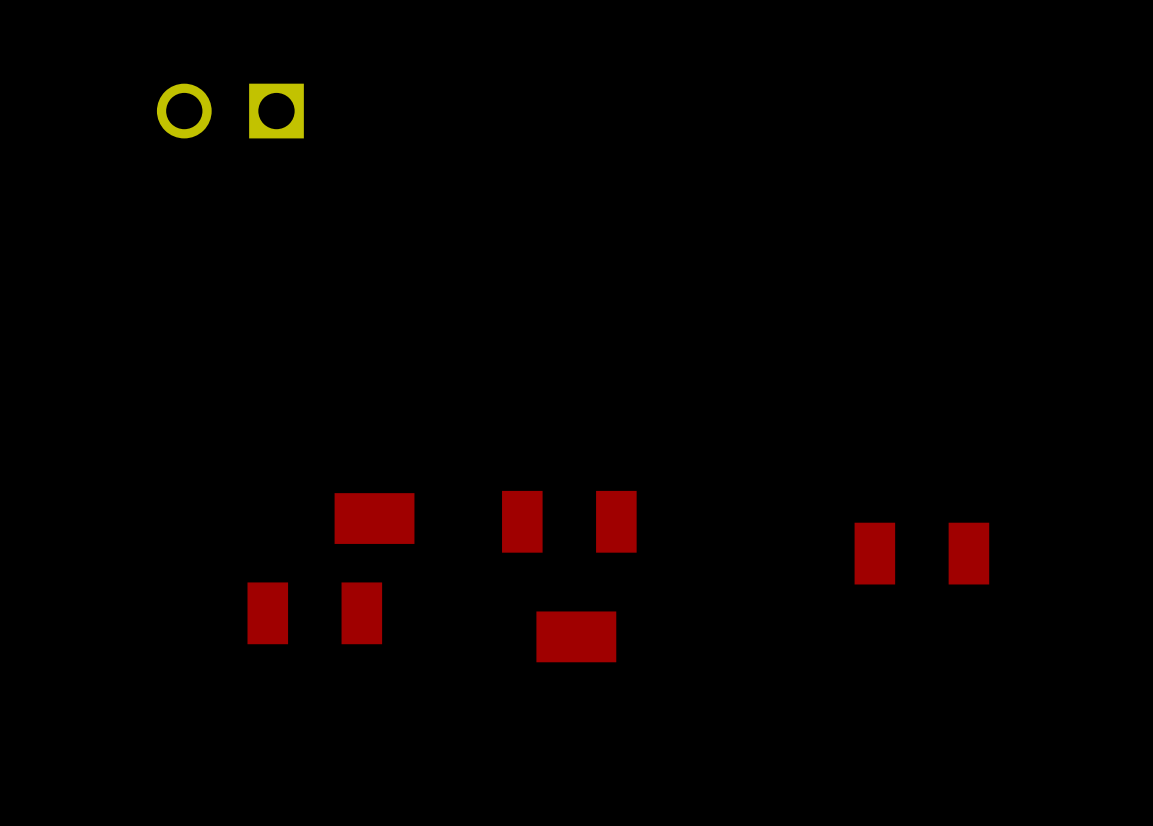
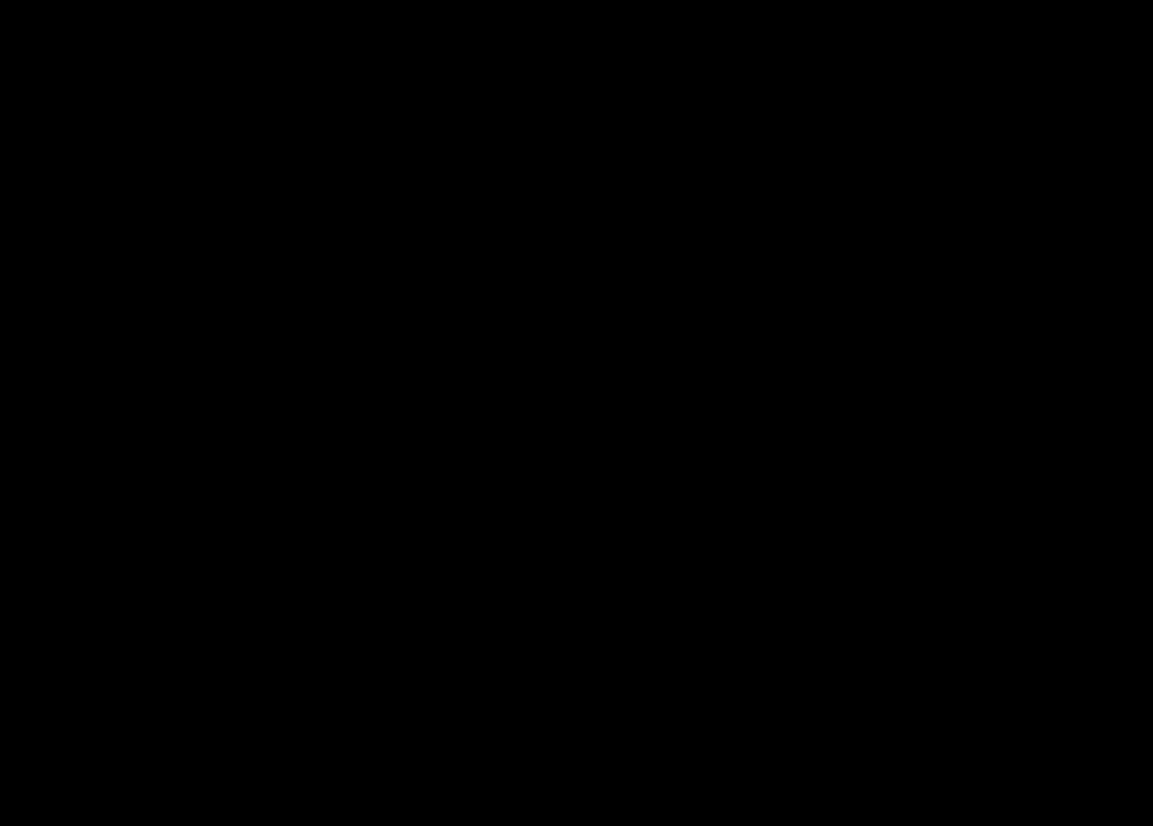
part: (230, 111) -> none
part: (374, 518) -> none
part: (569, 521) -> none
part: (921, 553) -> none
part: (314, 613) -> none
part: (576, 636) -> none

